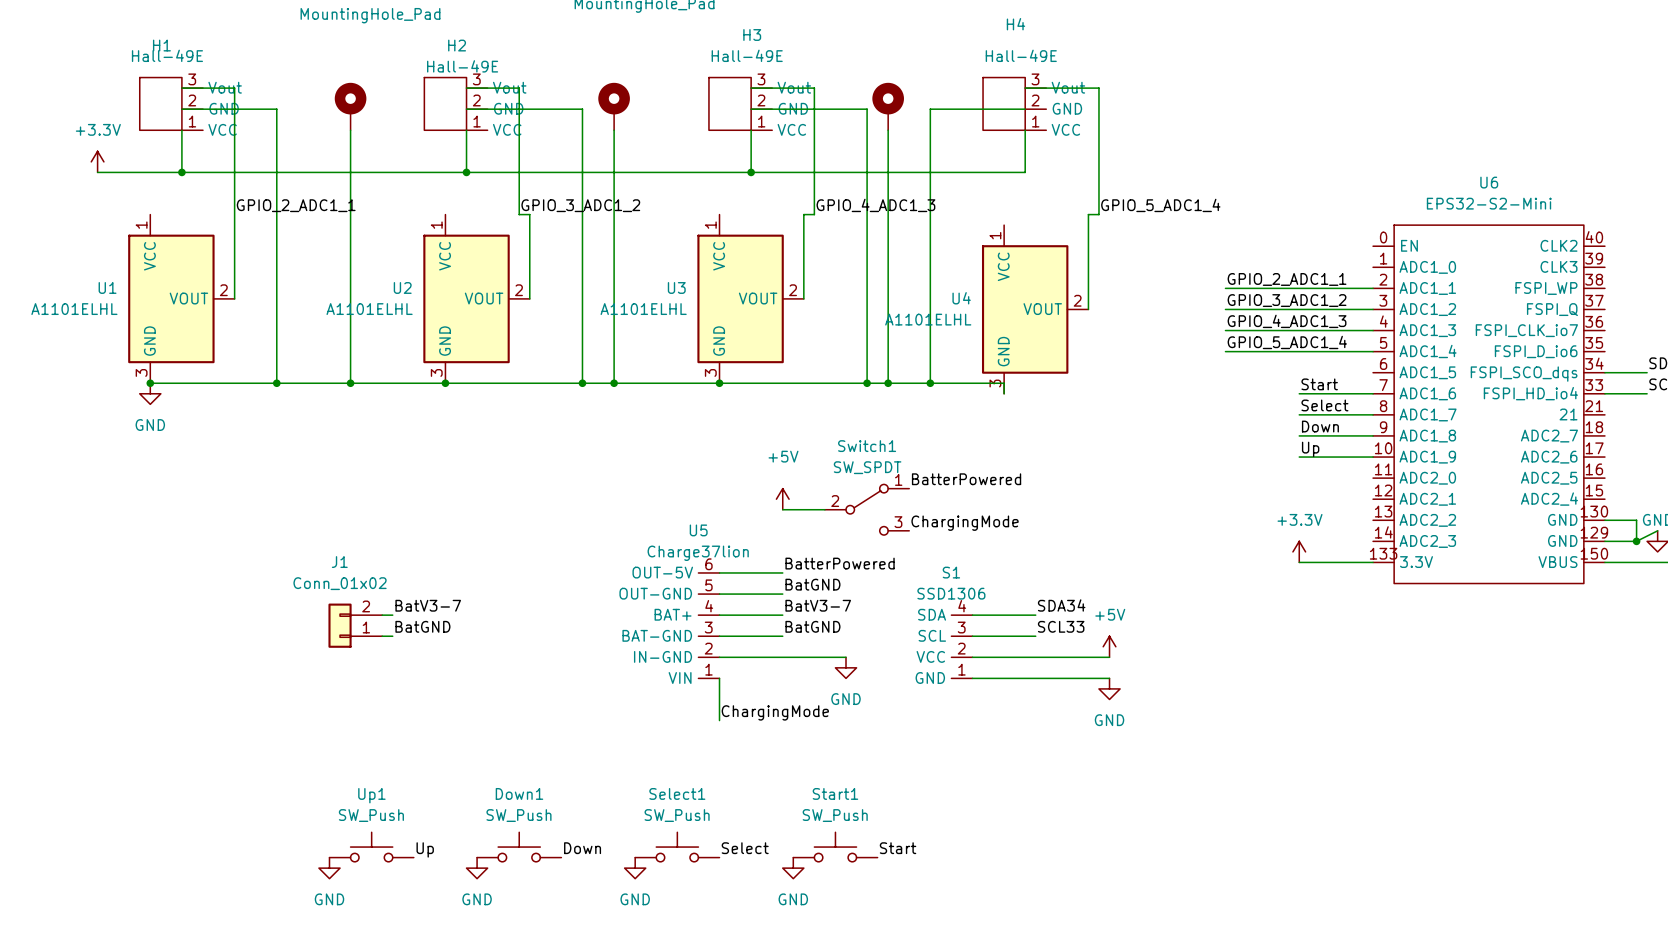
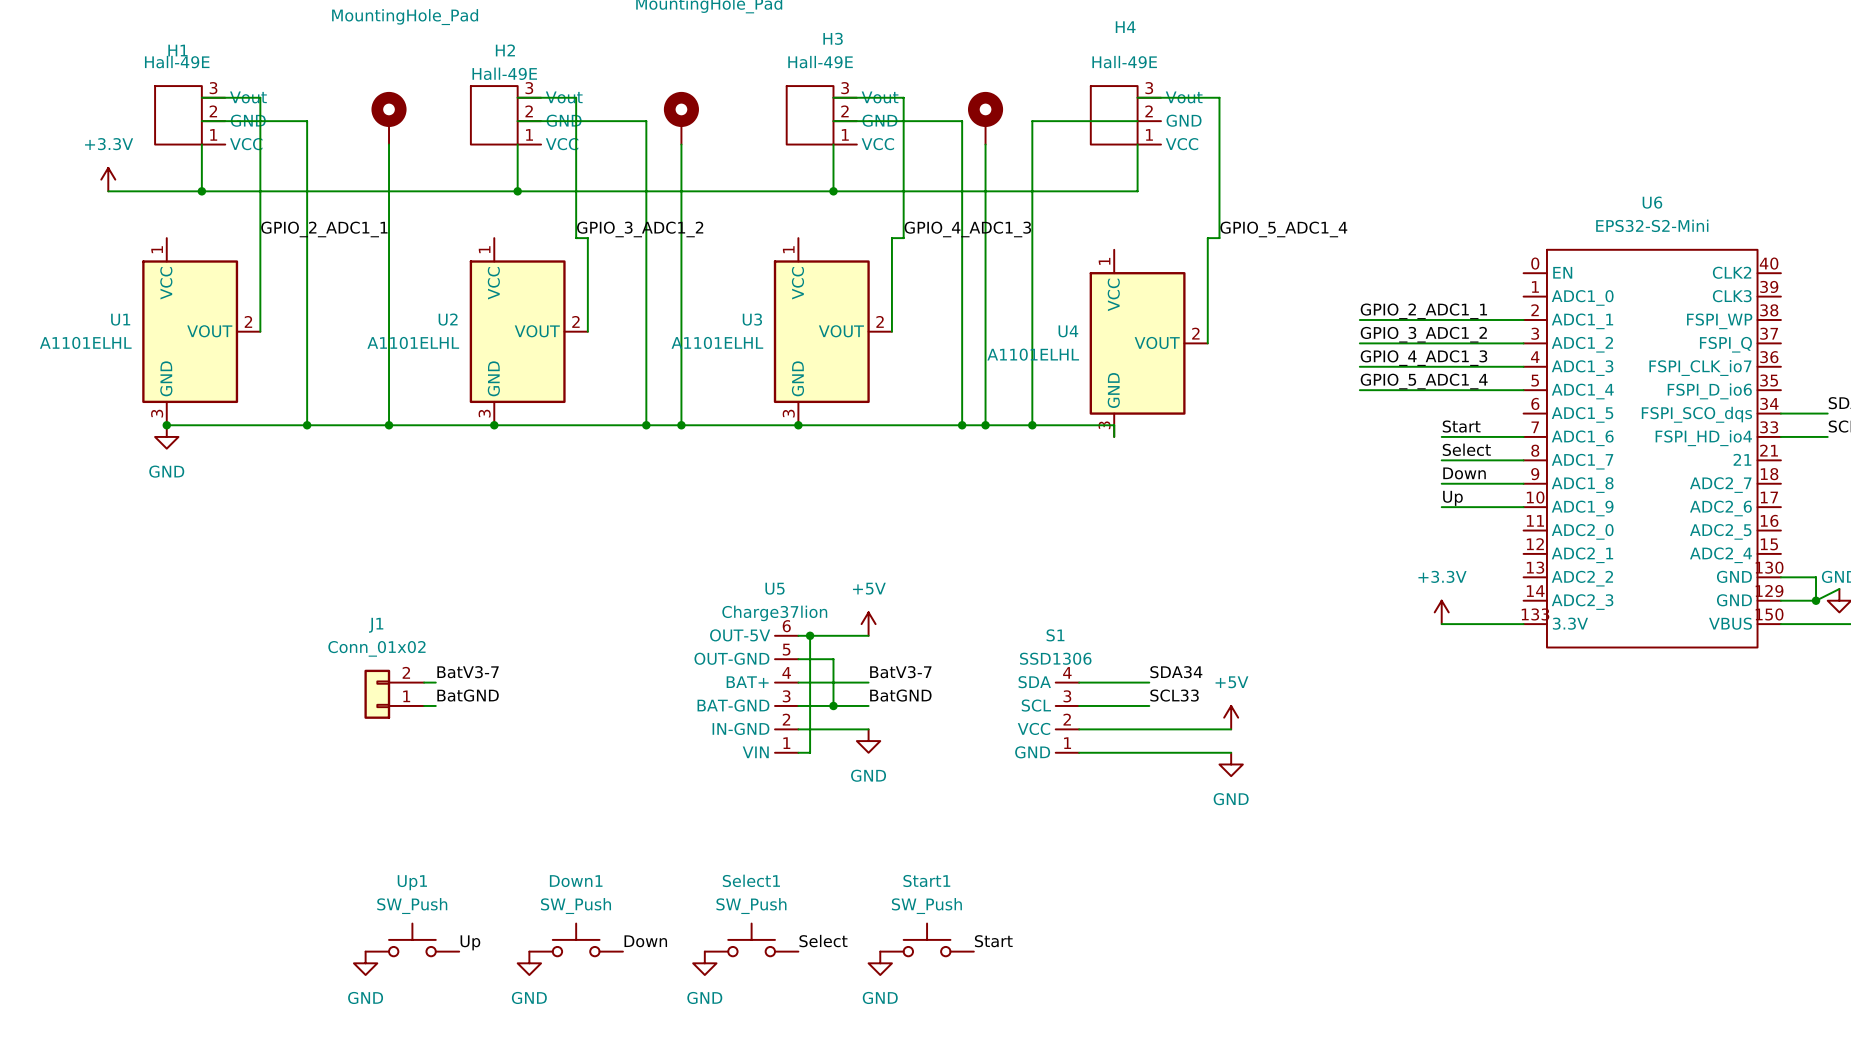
power symbol text position: +5V (783, 456) -> +5V (869, 588)
label: BatterPowered (966, 479) -> none
power symbol position: +5V (782, 499) -> +5V (868, 624)
wire: (782, 509) (824, 509) -> none
Switch1: SW_SPDT (867, 509) -> none
label: ChargingMode (965, 523) -> none
label: BatterPowered (840, 563) -> none
junction: none -> (810, 635)
label: BatGND (812, 584) -> none
wire: (751, 594) (782, 594) -> (833, 659) (833, 705)
junction: none -> (833, 705)
wire: (782, 657) (846, 657) -> none
power symbol position: GND (846, 667) -> GND (868, 741)
wire: (719, 678) (719, 720) -> (798, 752) (810, 752) (810, 635)
label: ChargingMode (775, 712) -> none

